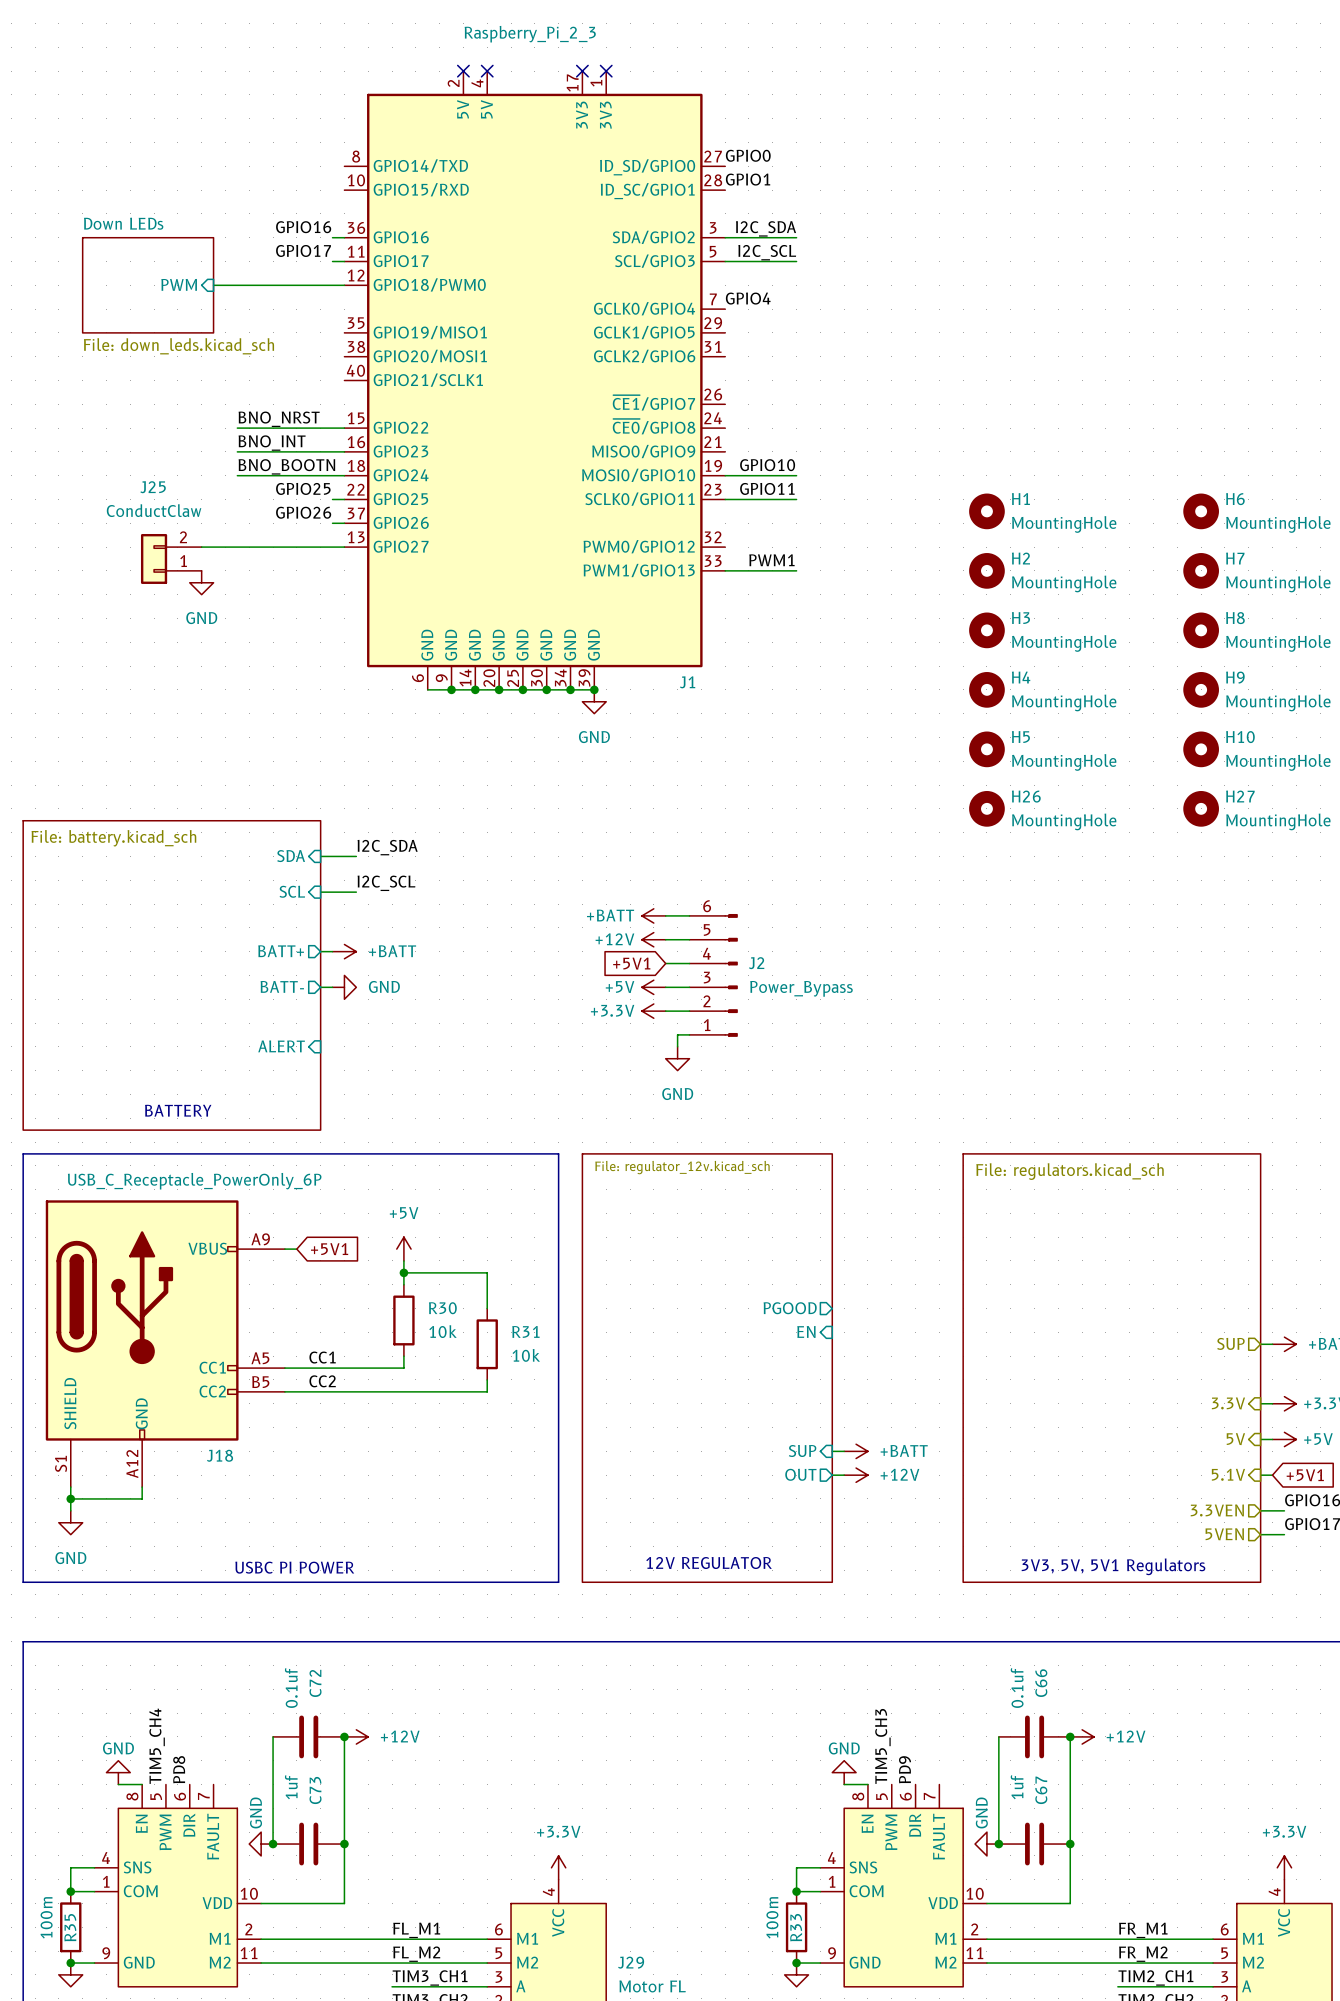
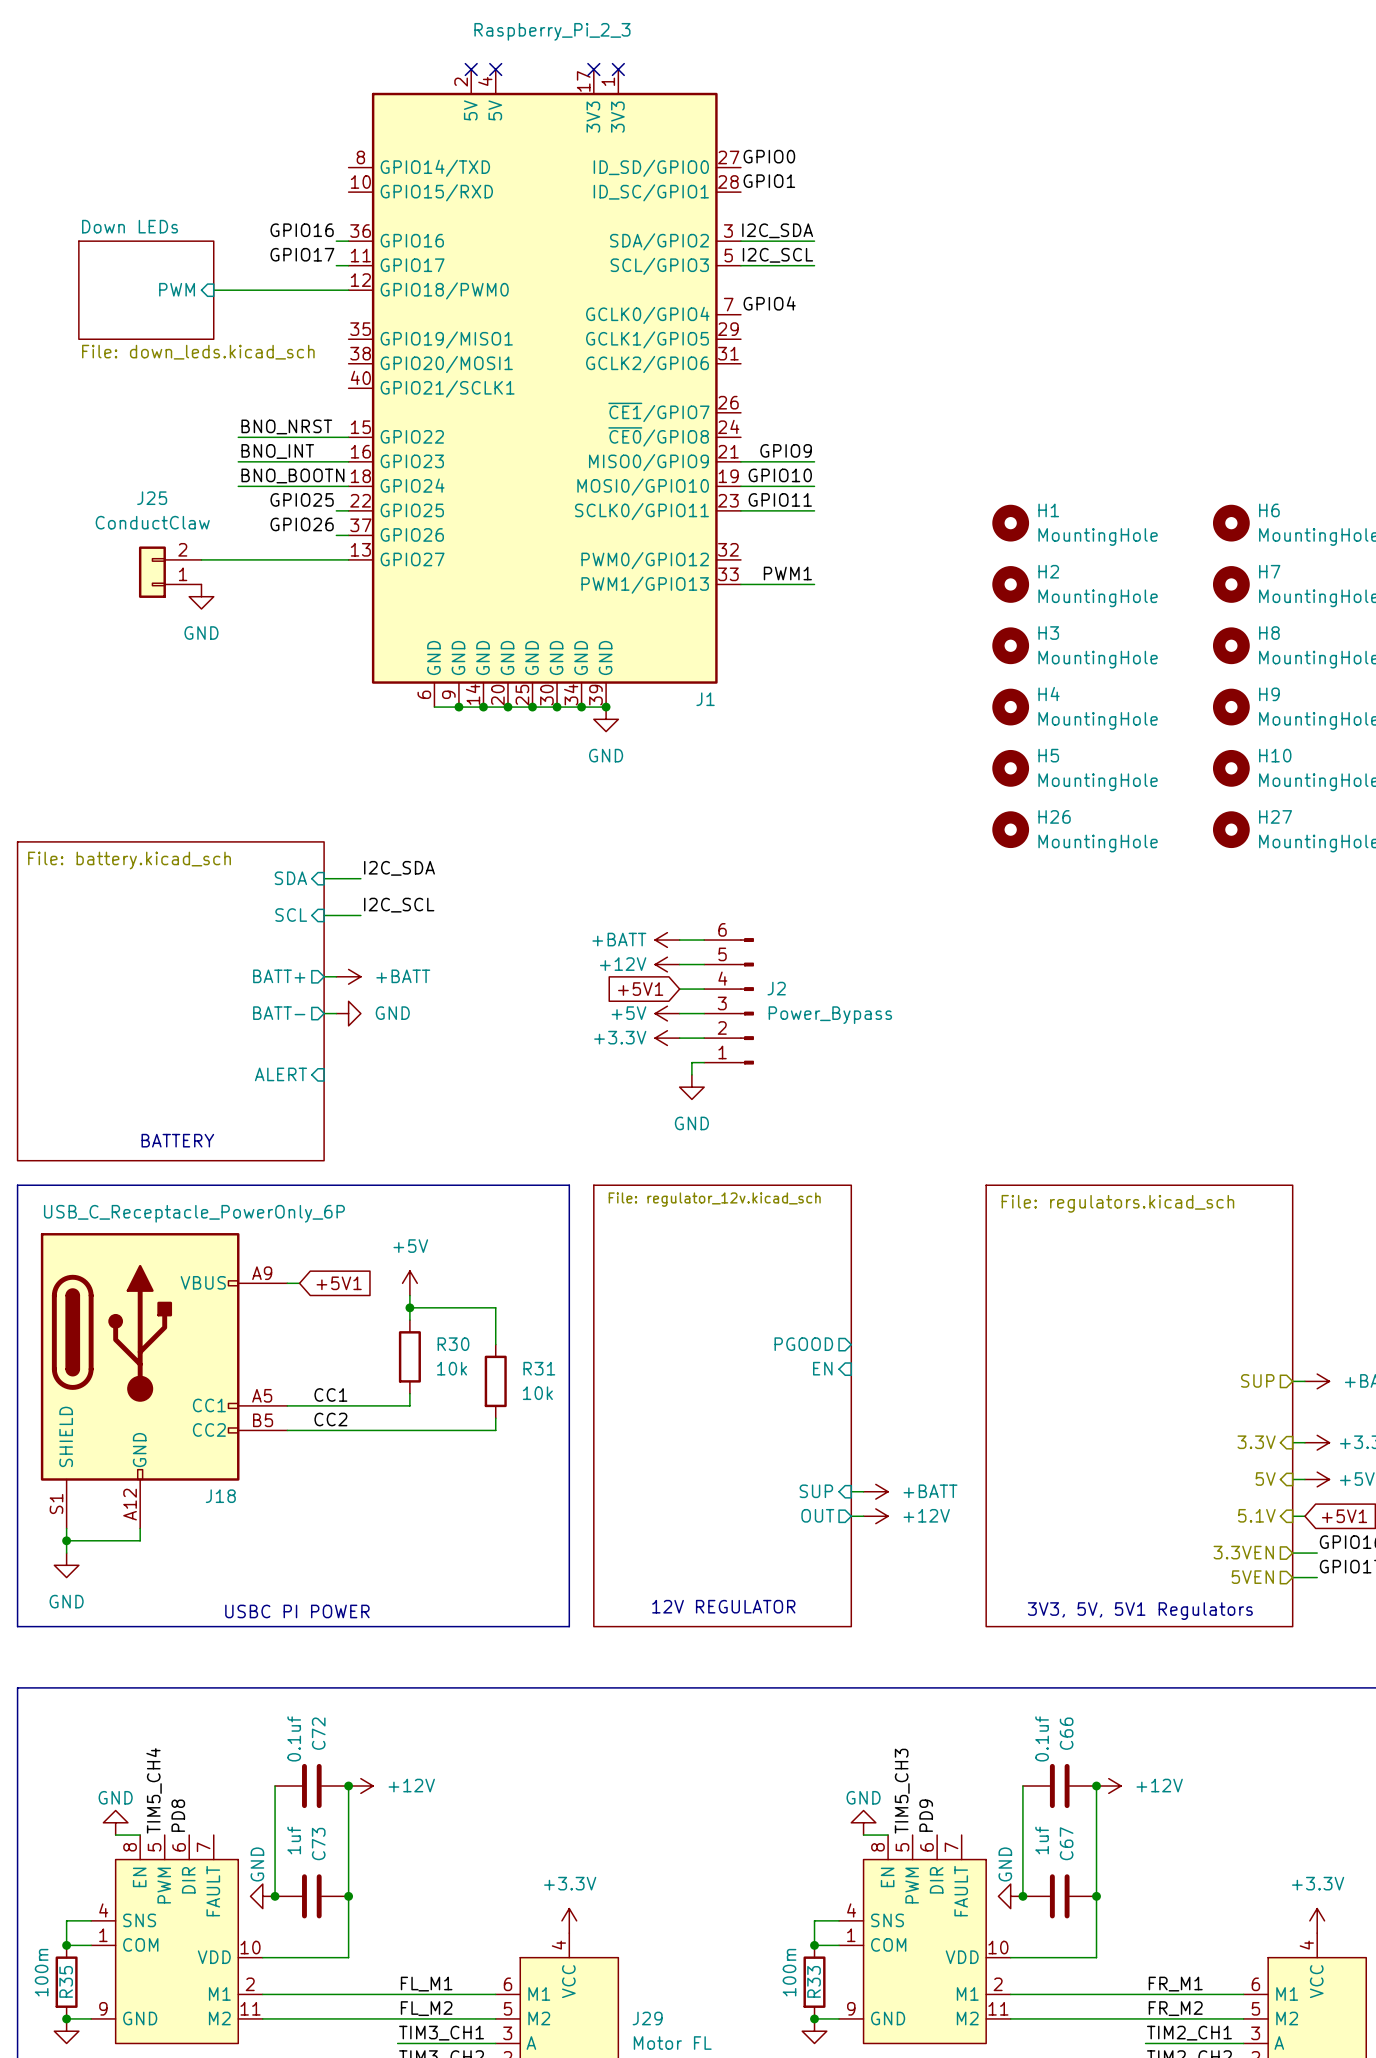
label: none -> GPIO9 (786, 450)
wire: none -> (740, 461) (814, 461)

